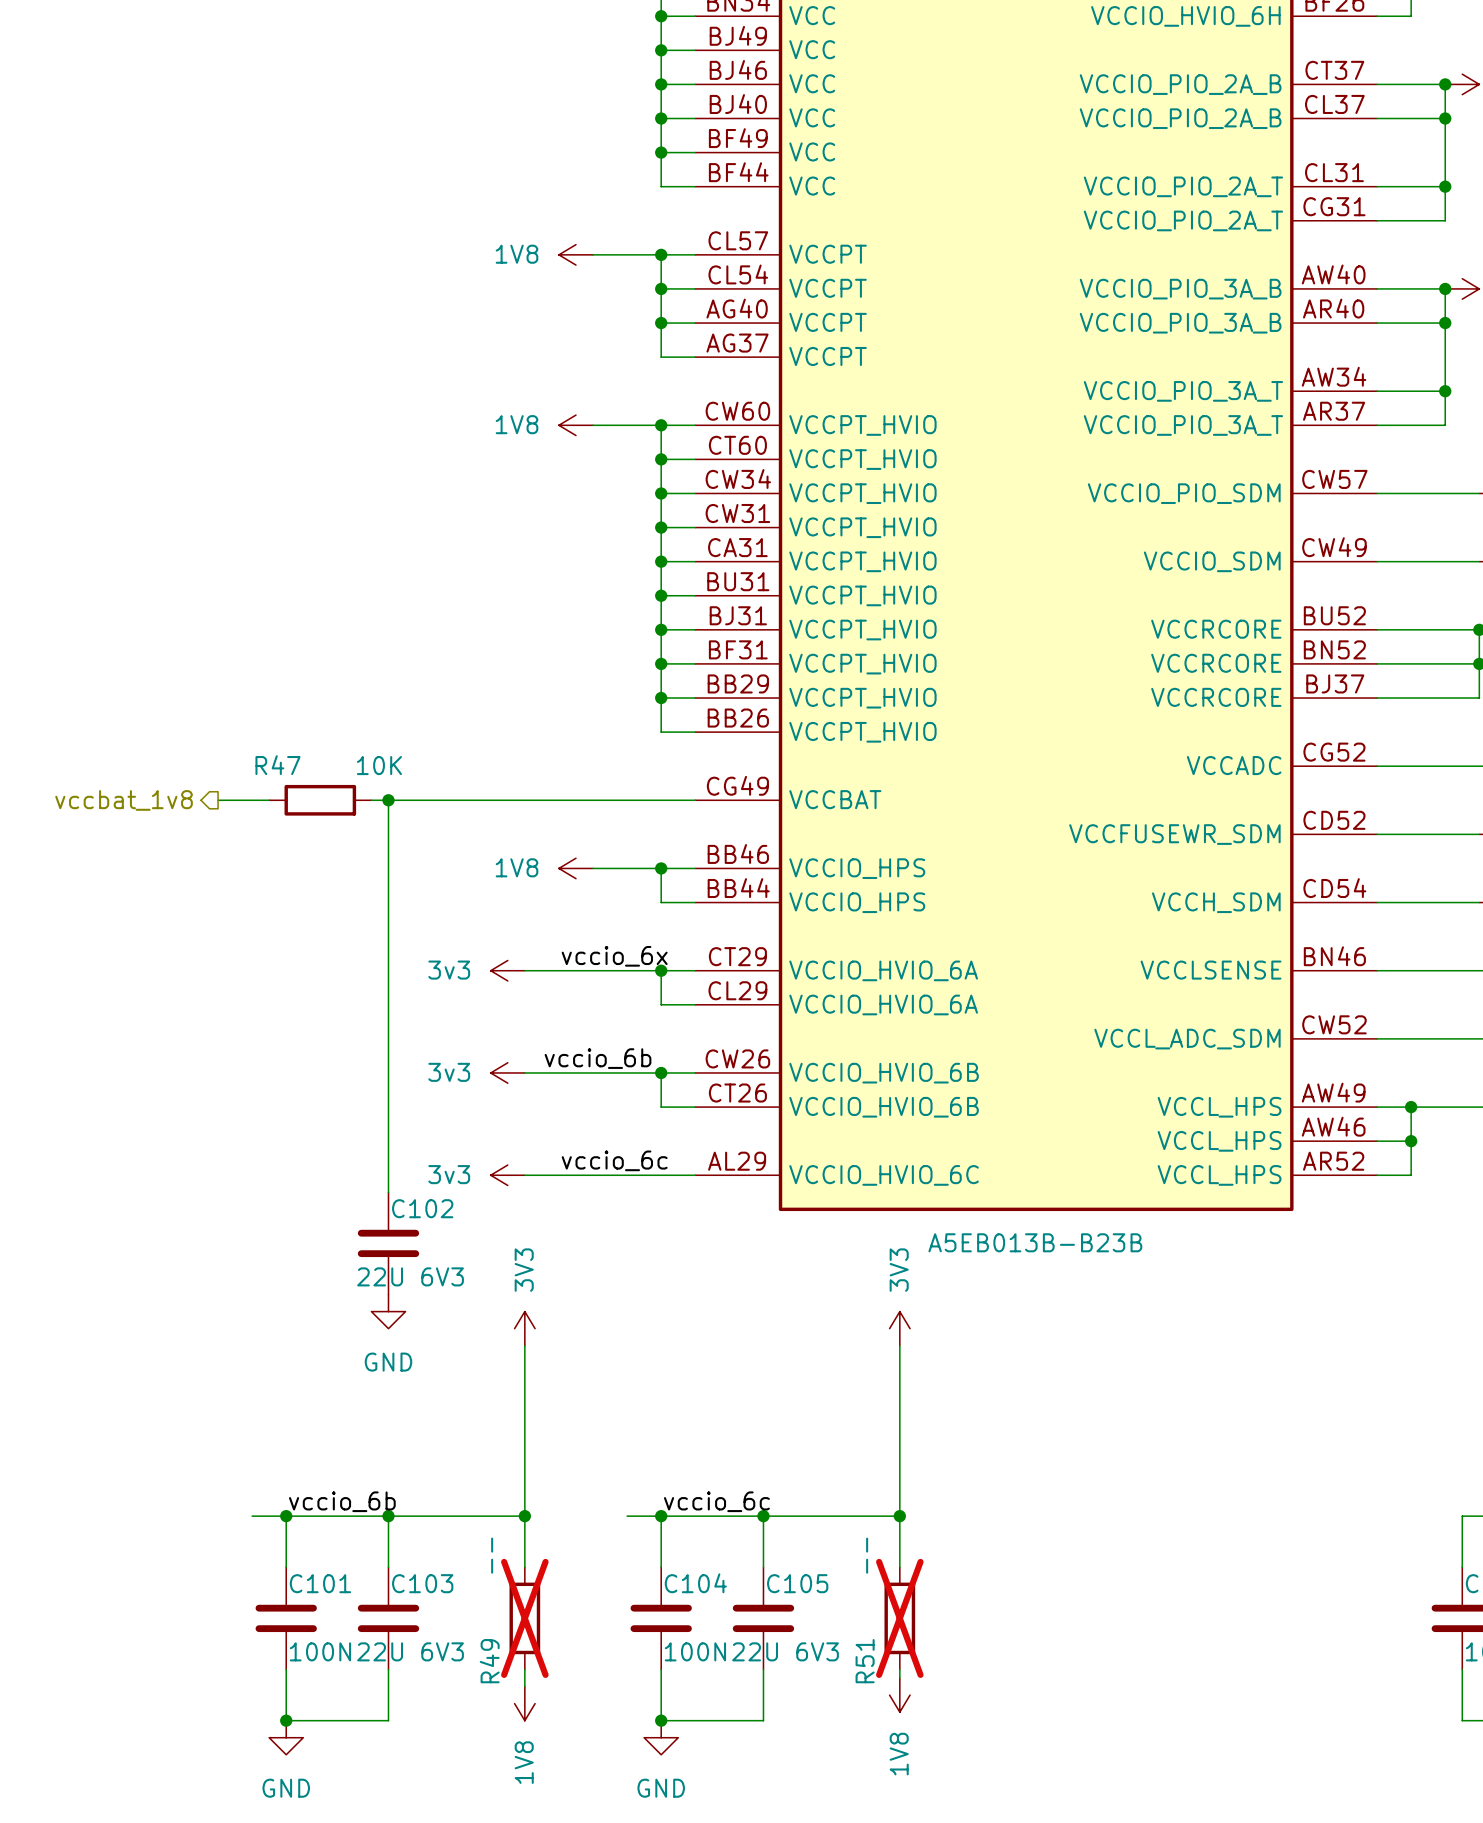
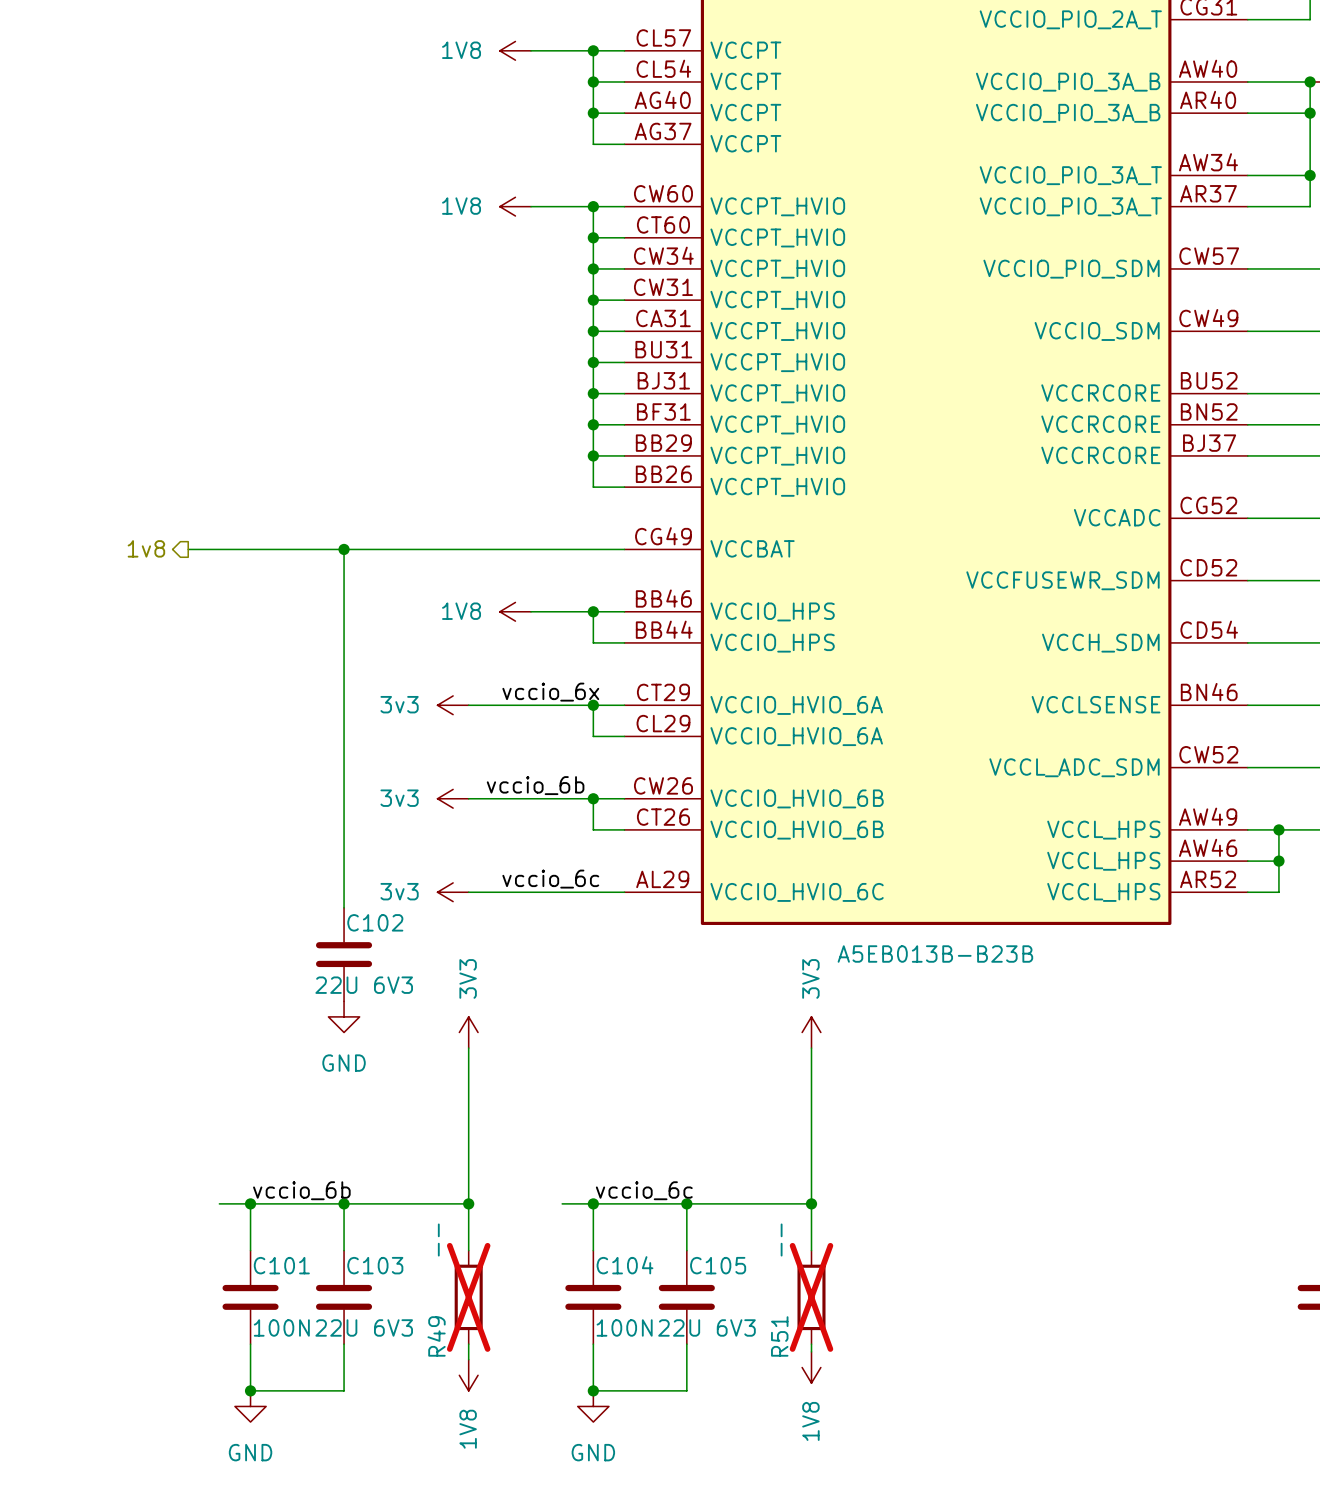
hierarchical label: vccbat_1v8 (124, 800) -> 1v8 (146, 548)
wire: none -> (234, 549) (328, 549)
R47: 10K (320, 800) -> none

